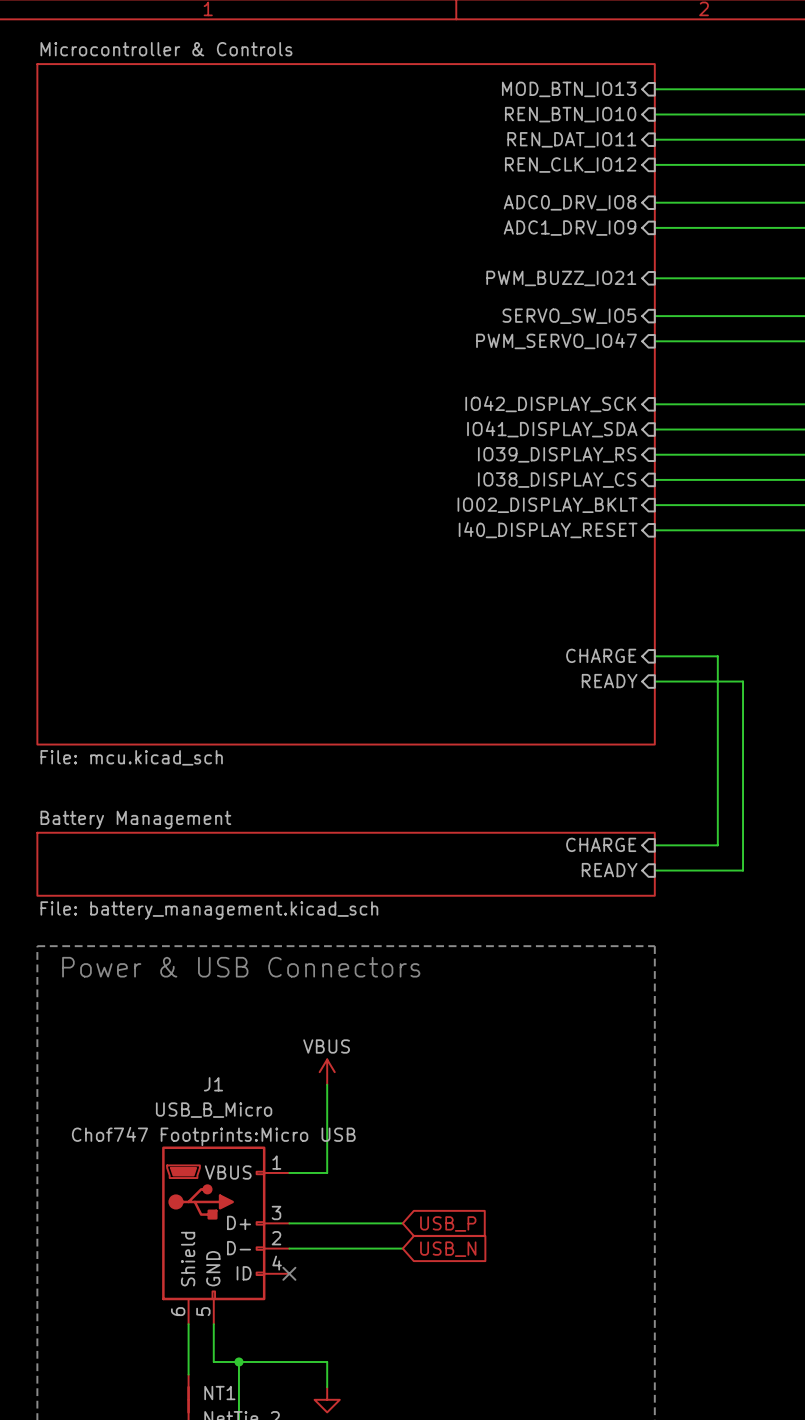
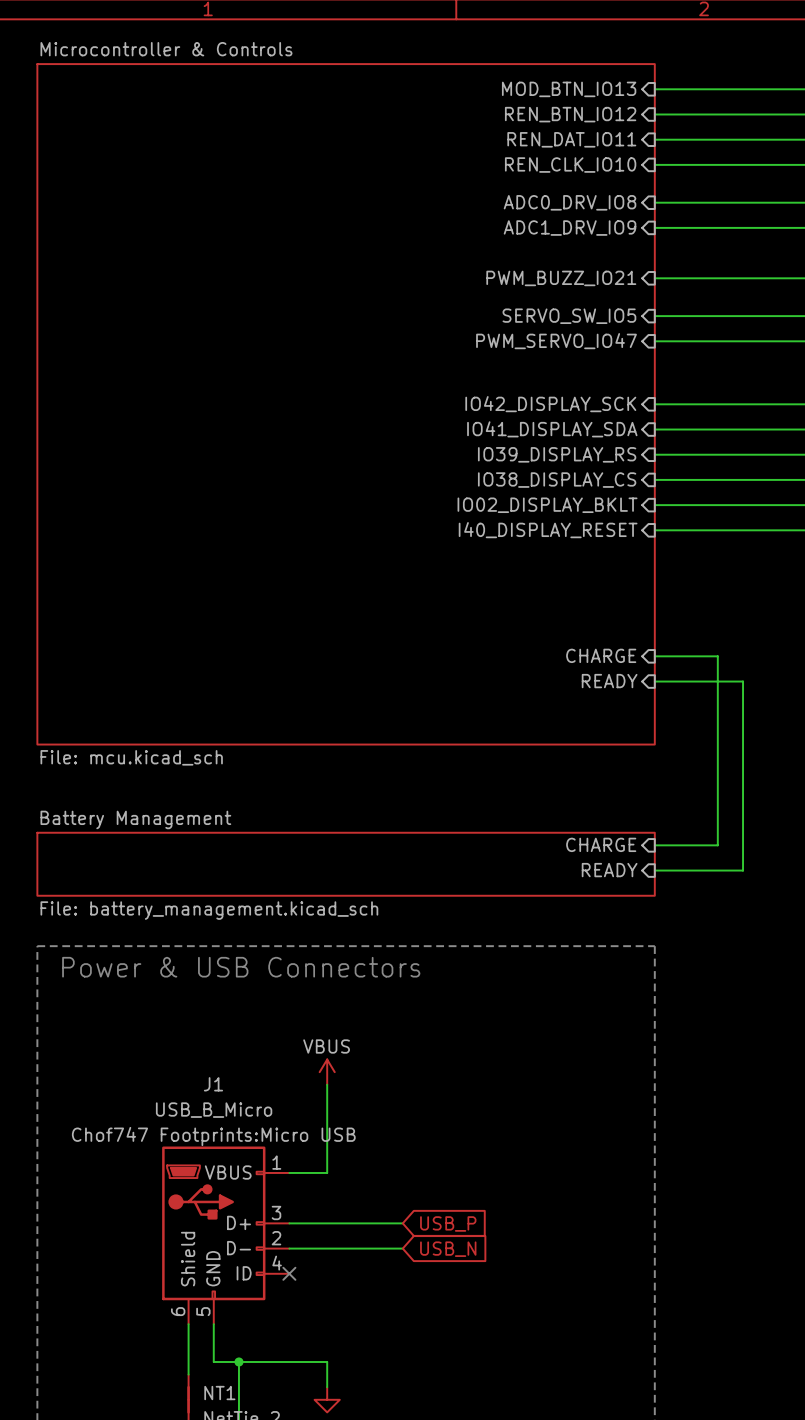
sheet pin: REN_BTN_IO10 (570, 114) -> REN_BTN_IO12 (570, 114)
sheet pin: REN_CLK_IO12 (570, 165) -> REN_CLK_IO10 (570, 165)

